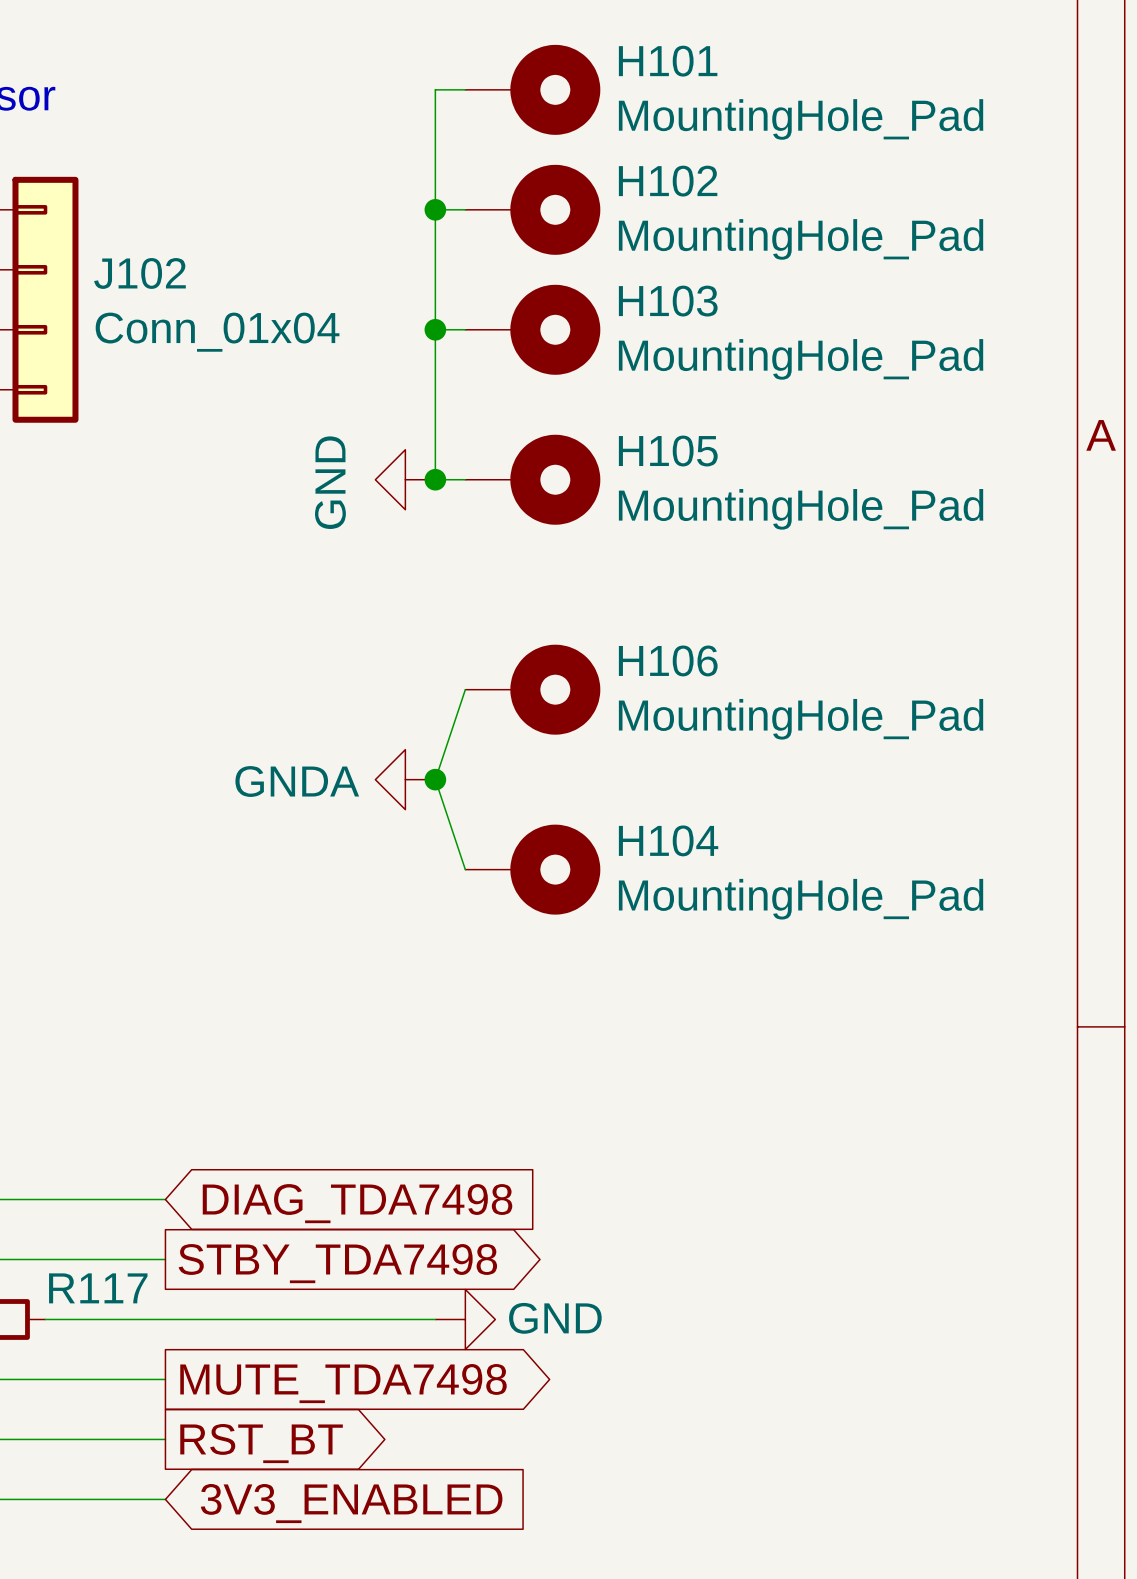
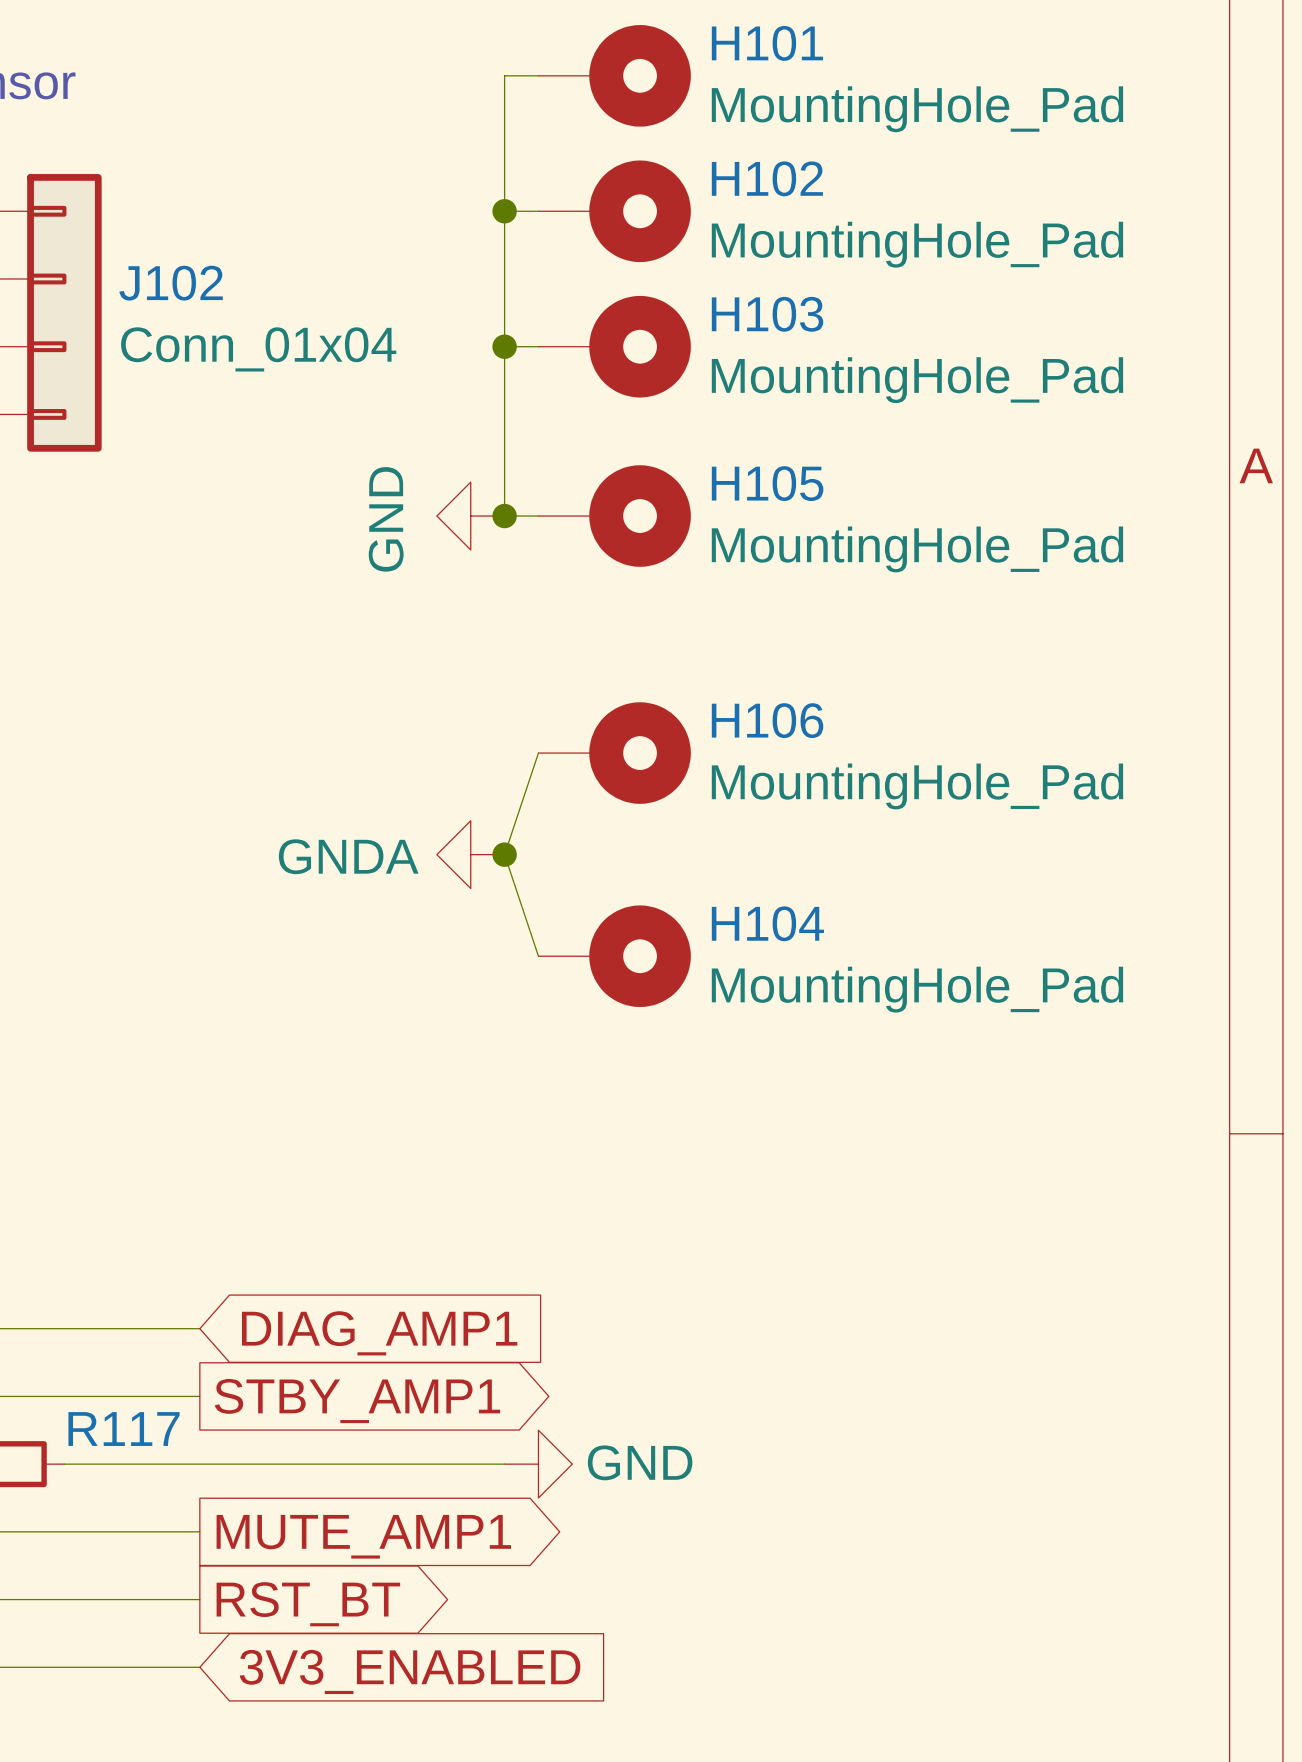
global label: DIAG_TDA7498 (357, 1203) -> DIAG_AMP1 (379, 1333)
global label: STBY_TDA7498 (337, 1263) -> STBY_AMP1 (357, 1401)
global label: MUTE_TDA7498 (343, 1383) -> MUTE_AMP1 (363, 1536)

